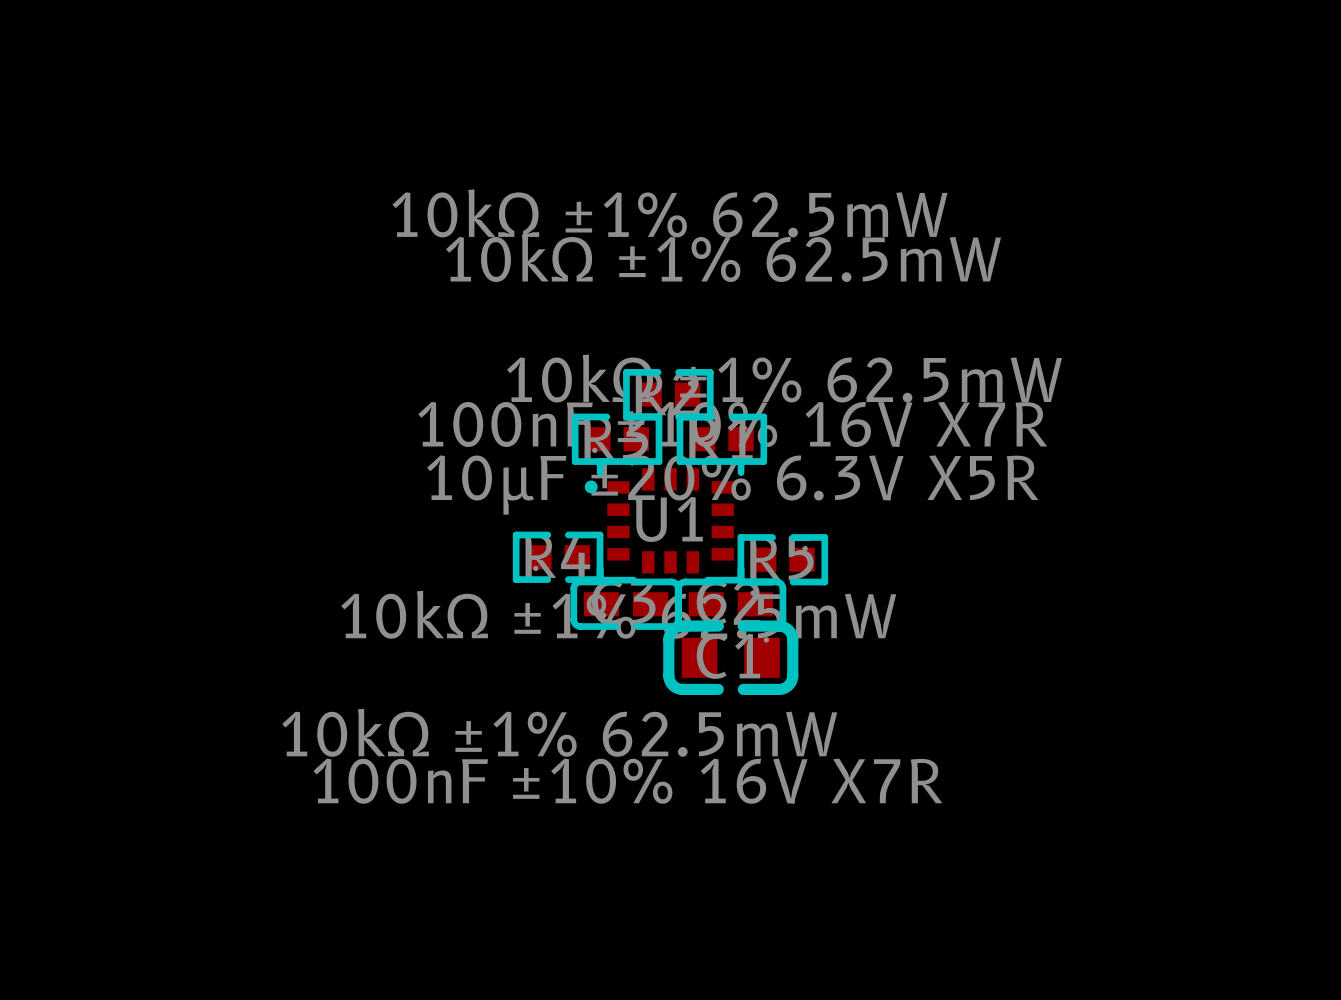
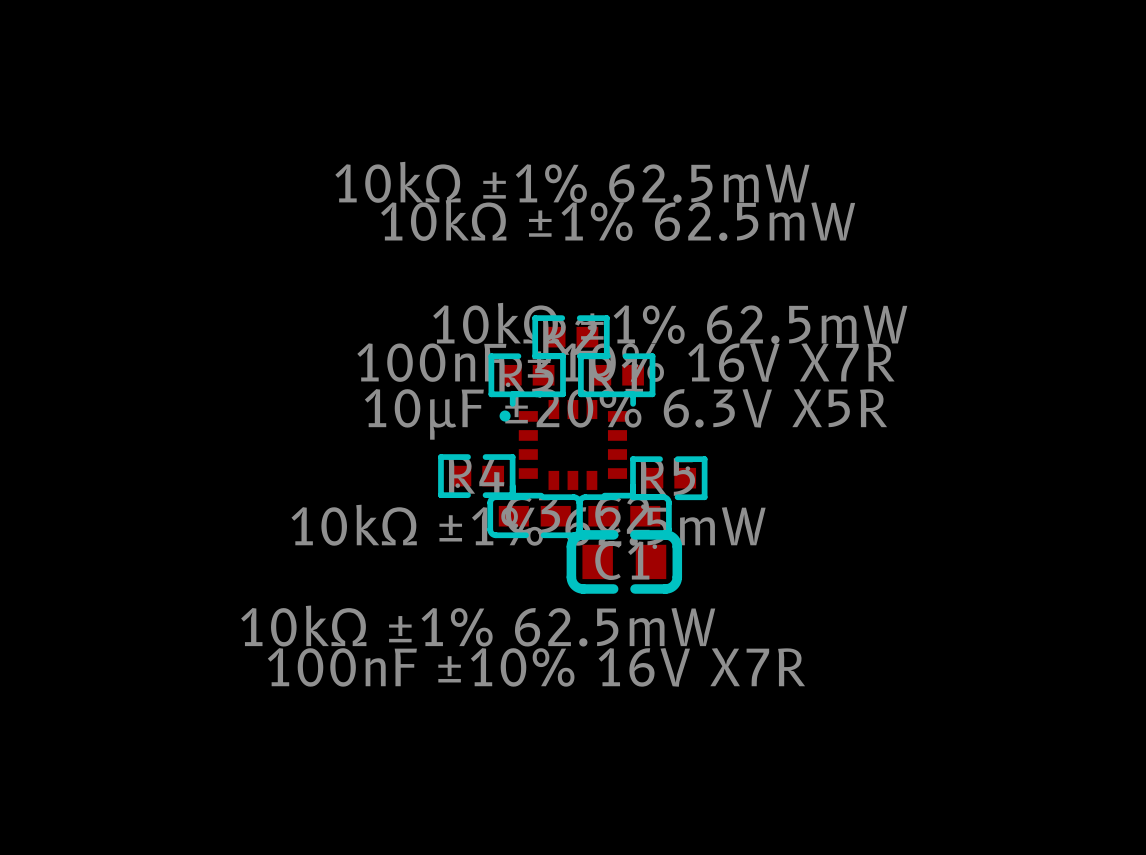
U1 name: U1 (669, 519) -> none

